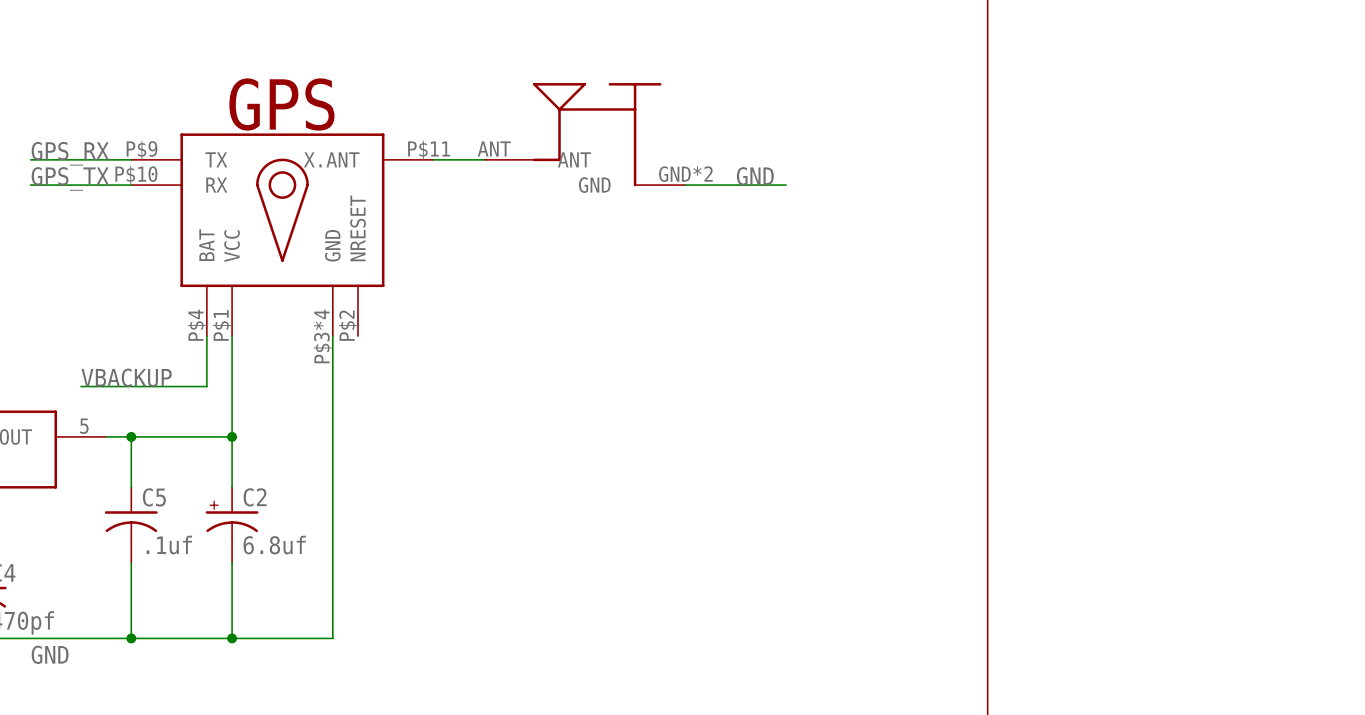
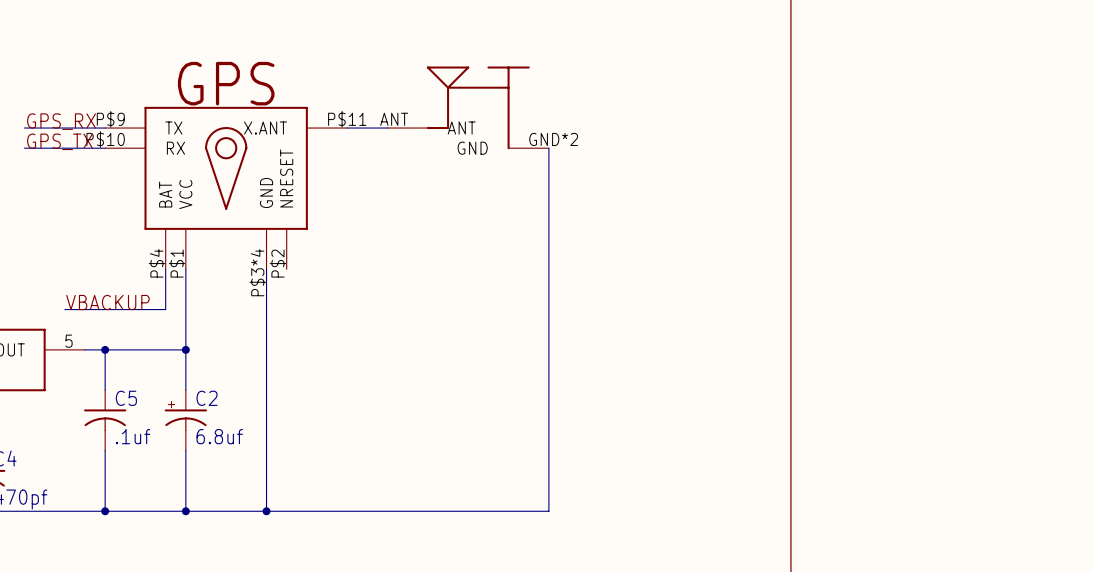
label: GND (755, 176) -> none
wire: (685, 185) (786, 185) -> (548, 148) (548, 511) (266, 511)
junction: none -> (266, 511)
label: GND (50, 654) -> none

